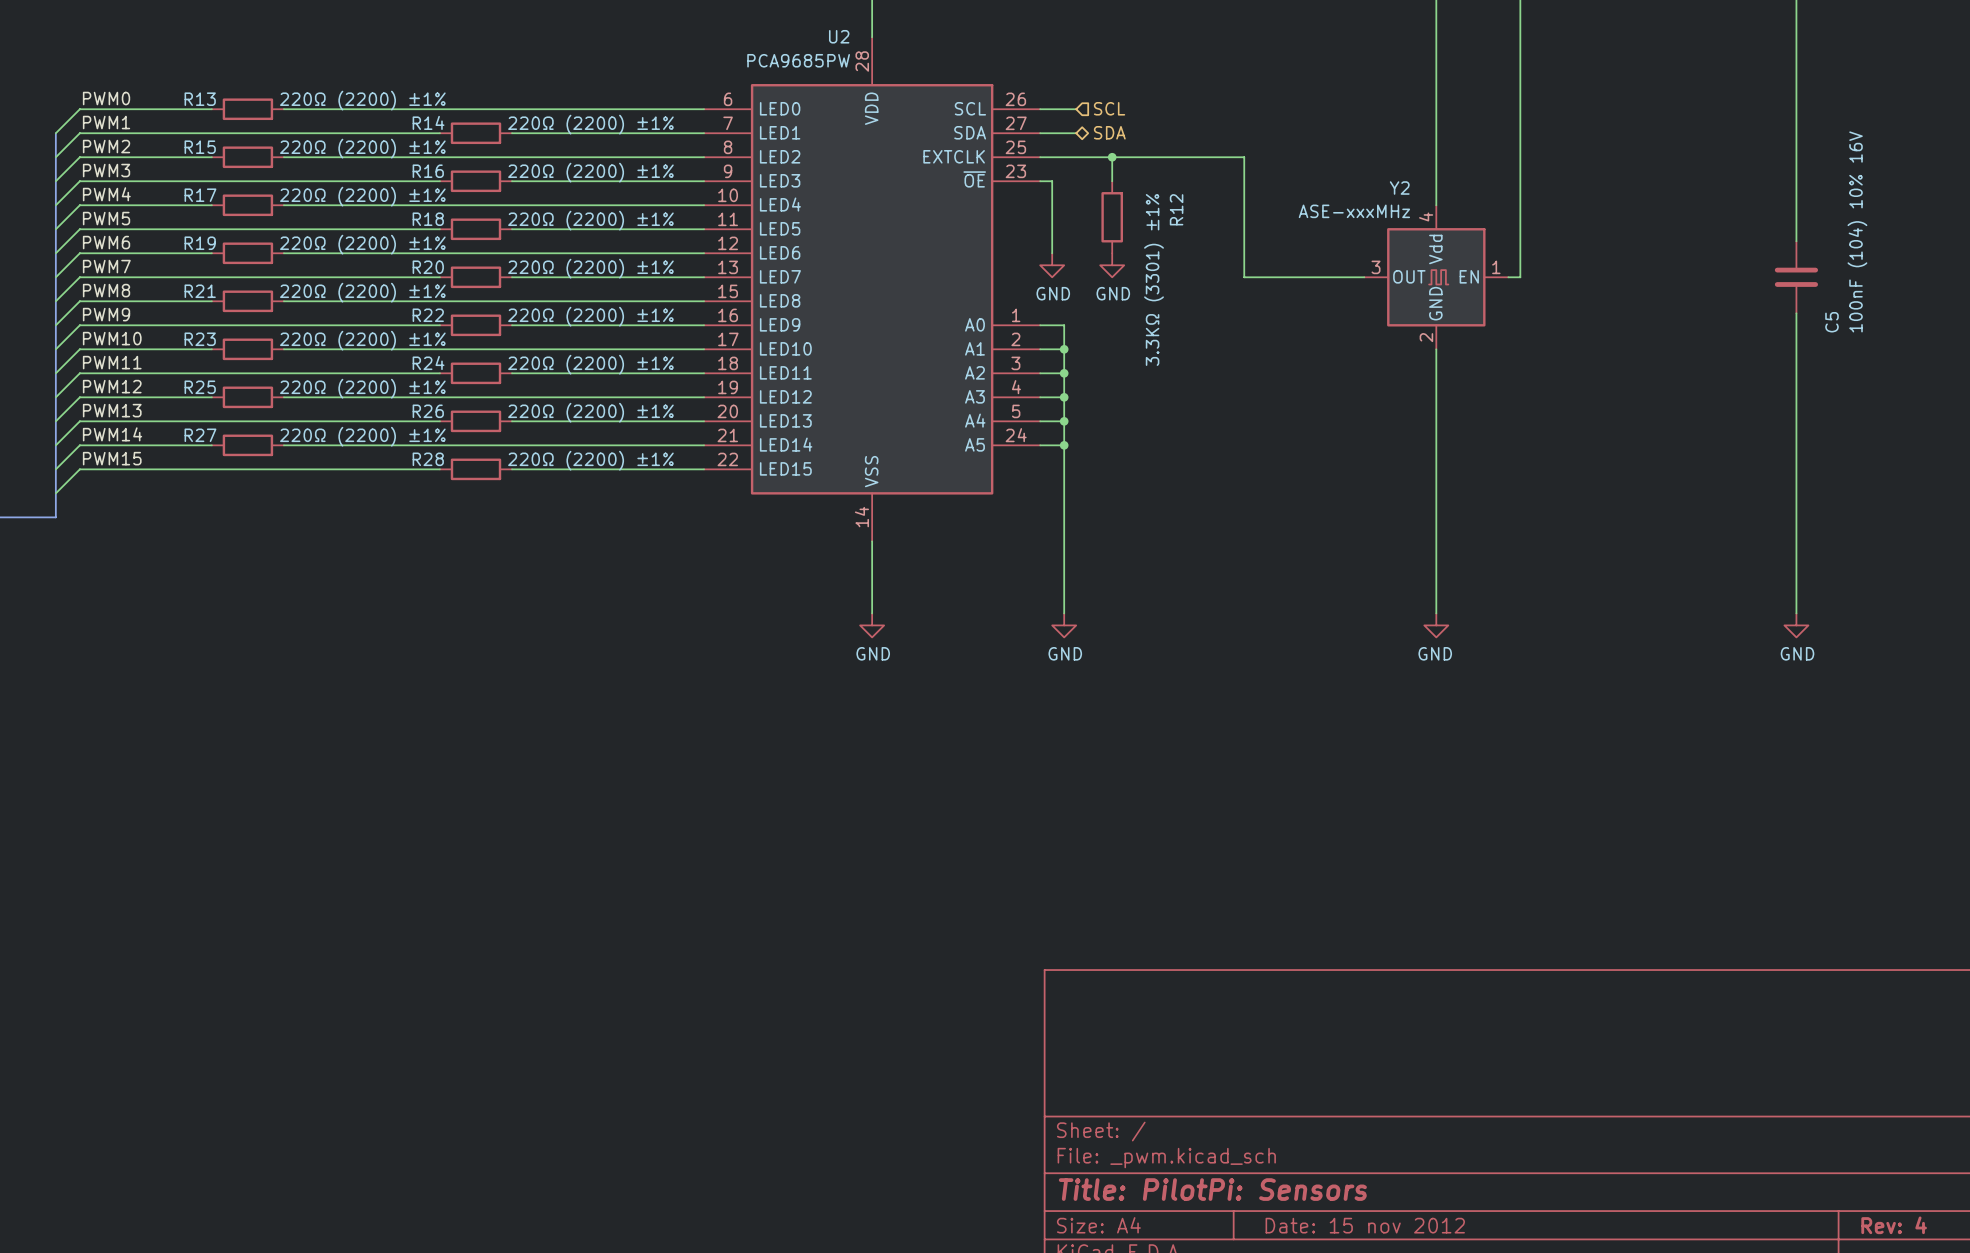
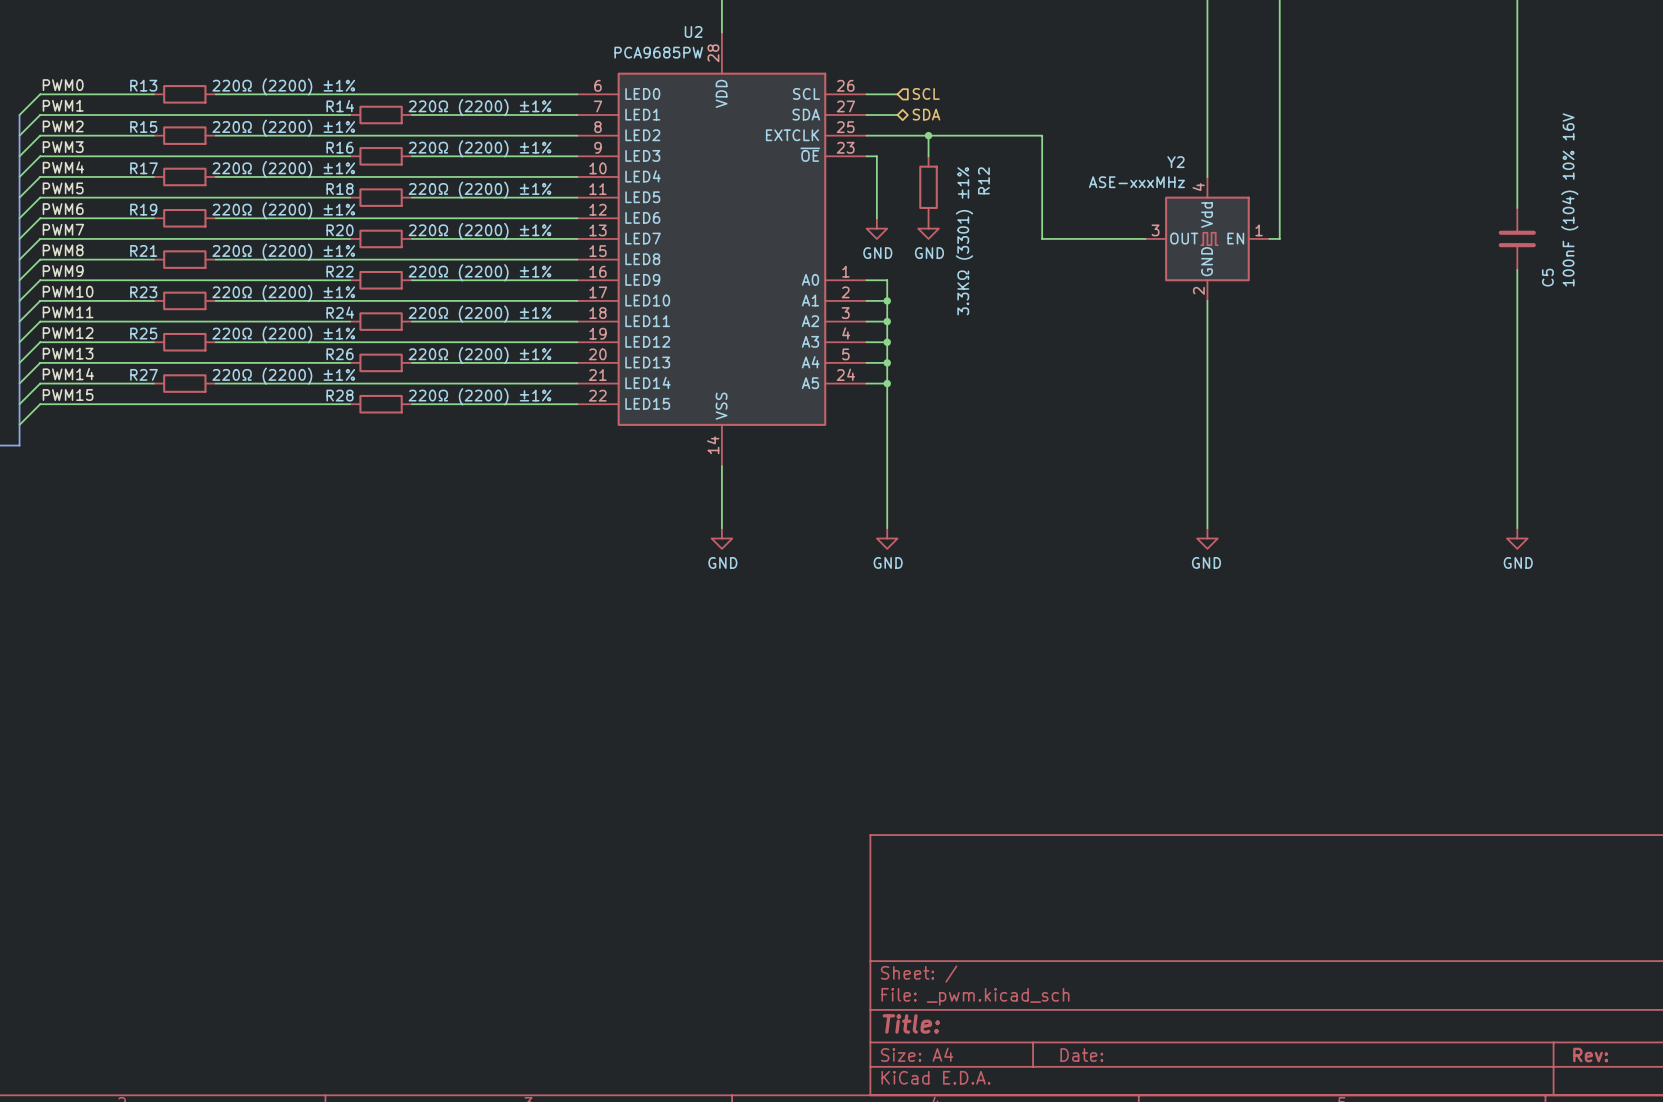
title block: Title: PilotPi: Sensors (1212, 1189) -> Title: (911, 1023)
title block: Date: 15 nov 2012 (1365, 1225) -> Date: (1081, 1055)
title block: Rev: 4 (1894, 1225) -> Rev: (1590, 1055)

